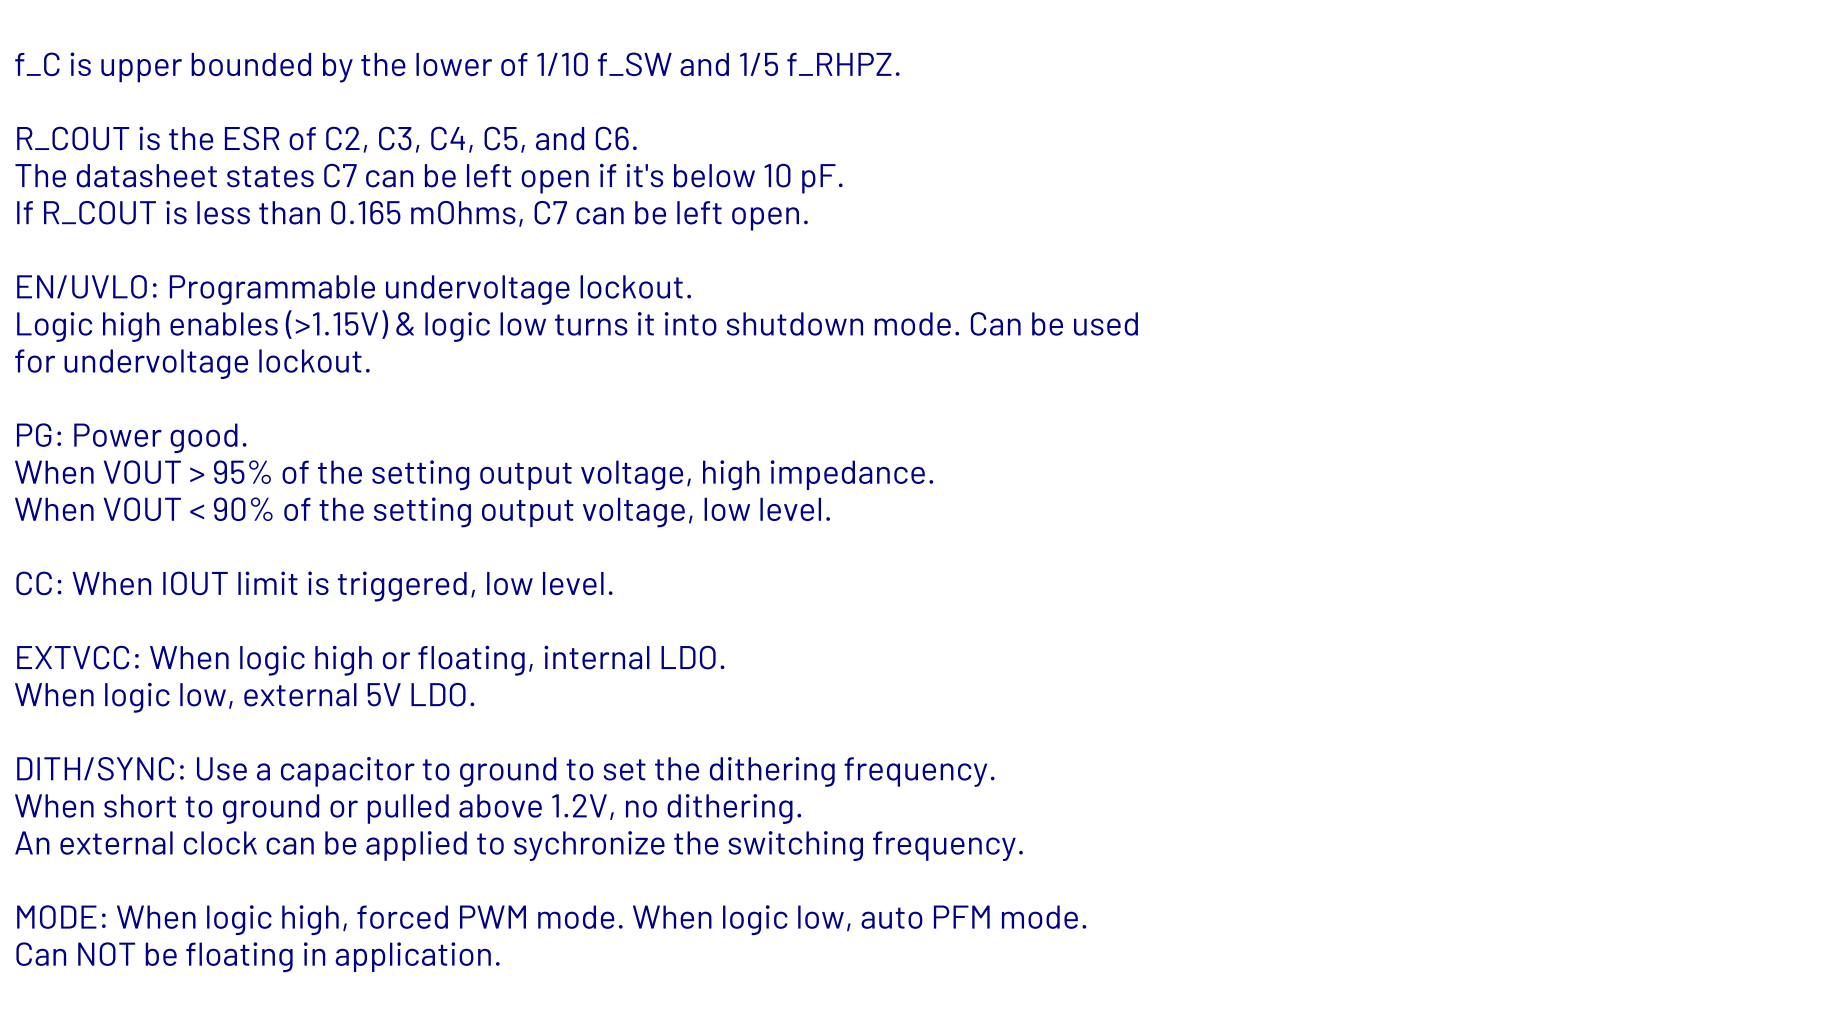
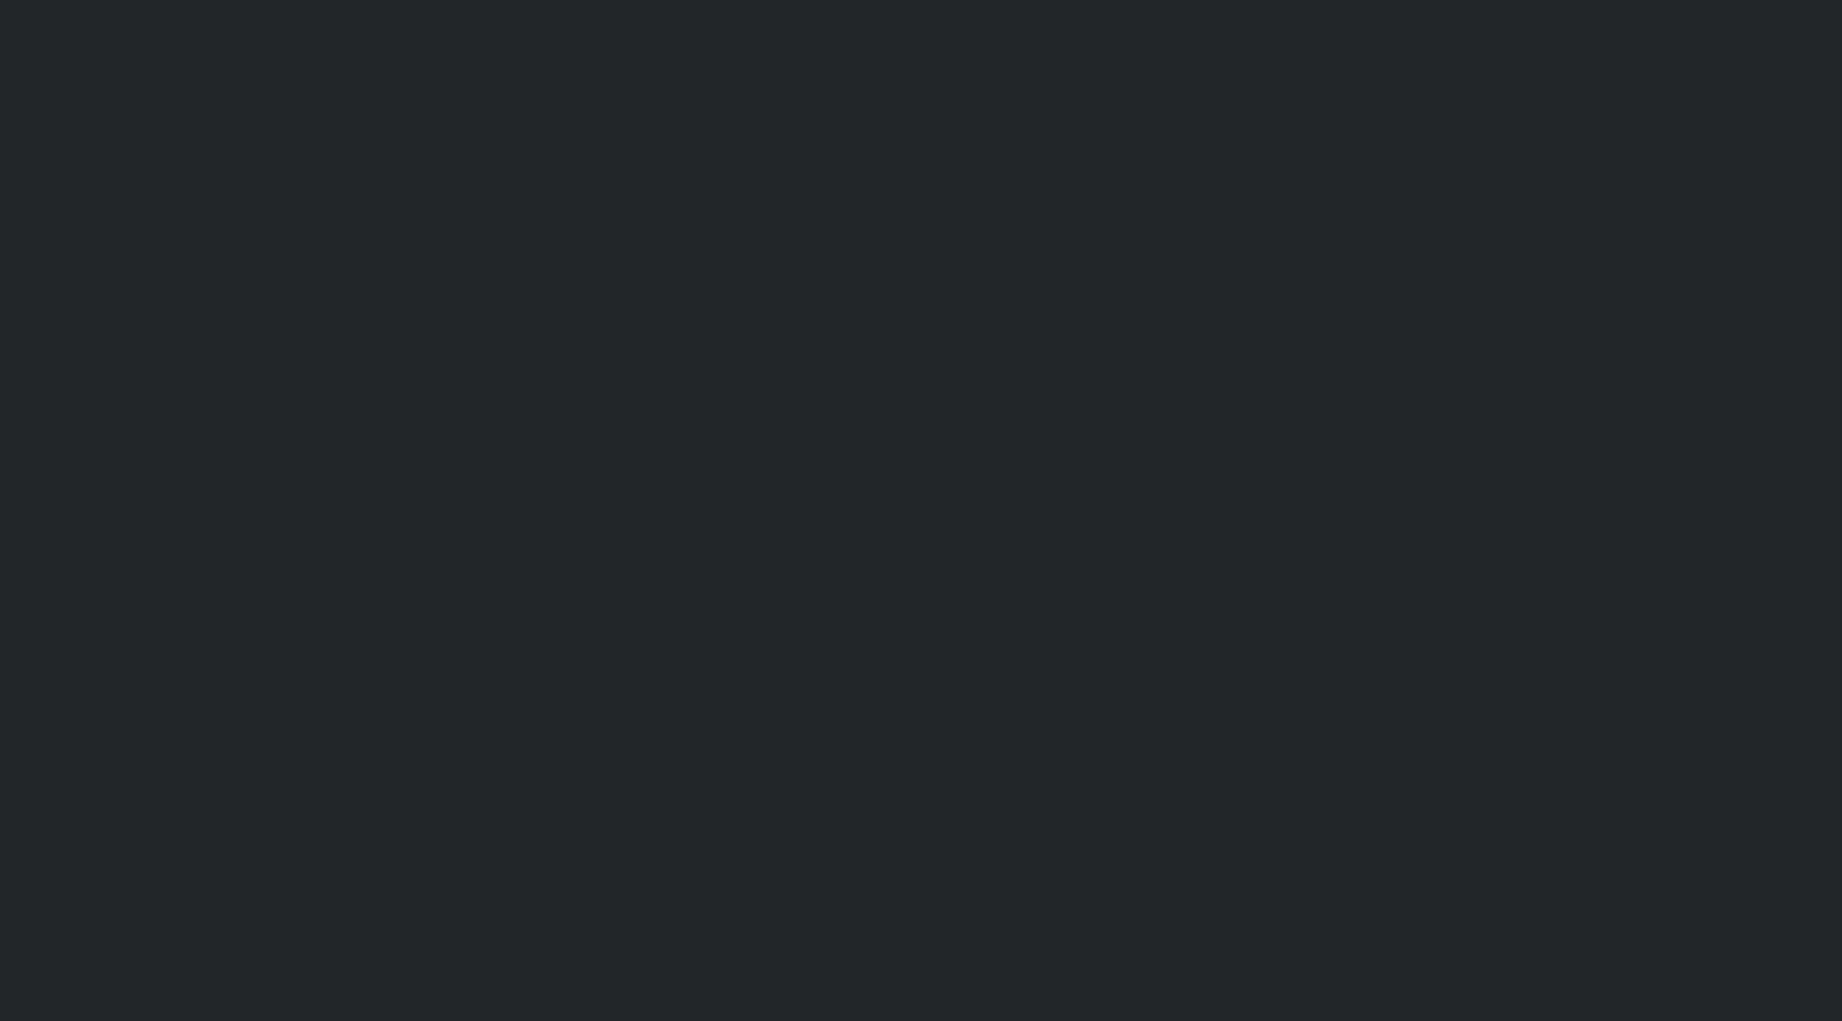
text: f_C is upper bounded by the lower of 1/10 f_SW and 1/5 f_RHPZ. (457, 67) -> none
text: R_COUT is the ESR of C2, C3, C4, C5, and C6. (326, 139) -> none
text: The datasheet states C7 can be left open if it's below 10 pF. (429, 178) -> none
text: If R_COUT is less than 0.165 mOhms, C7 can be left open. (412, 215) -> none
text: EN/UVLO: Programmable undervoltage lockout. (354, 289) -> none
text: Logic high enables (>1.15V) & logic low turns it into shutdown mode. Can be used (577, 326) -> none
text: for undervoltage lockout. (192, 364) -> none
text: PG: Power good. (131, 438) -> none
text: When VOUT > 95% of the setting output voltage, high impedance. (474, 475) -> none
text: When VOUT < 90% of the setting output voltage, low level. (422, 512) -> none
text: CC: When IOUT limit is triggered, low level. (314, 586) -> none
text: EXTVCC: When logic high or floating, internal LDO. (370, 660) -> none
text: When logic low, external 5V LDO. (244, 697) -> none
text: DITH/SYNC: Use a capacitor to ground to set the dithering frequency. (505, 771) -> none
text: When short to ground or pulled above 1.2V, no dithering. (408, 808) -> none
text: An external clock can be applied to sychronize the switching frequency. (518, 846) -> none
text: MODE: When logic high, forced PWM mode. When logic low, auto PFM mode. (551, 920) -> none
text: Can NOT be floating in application. (258, 957) -> none

